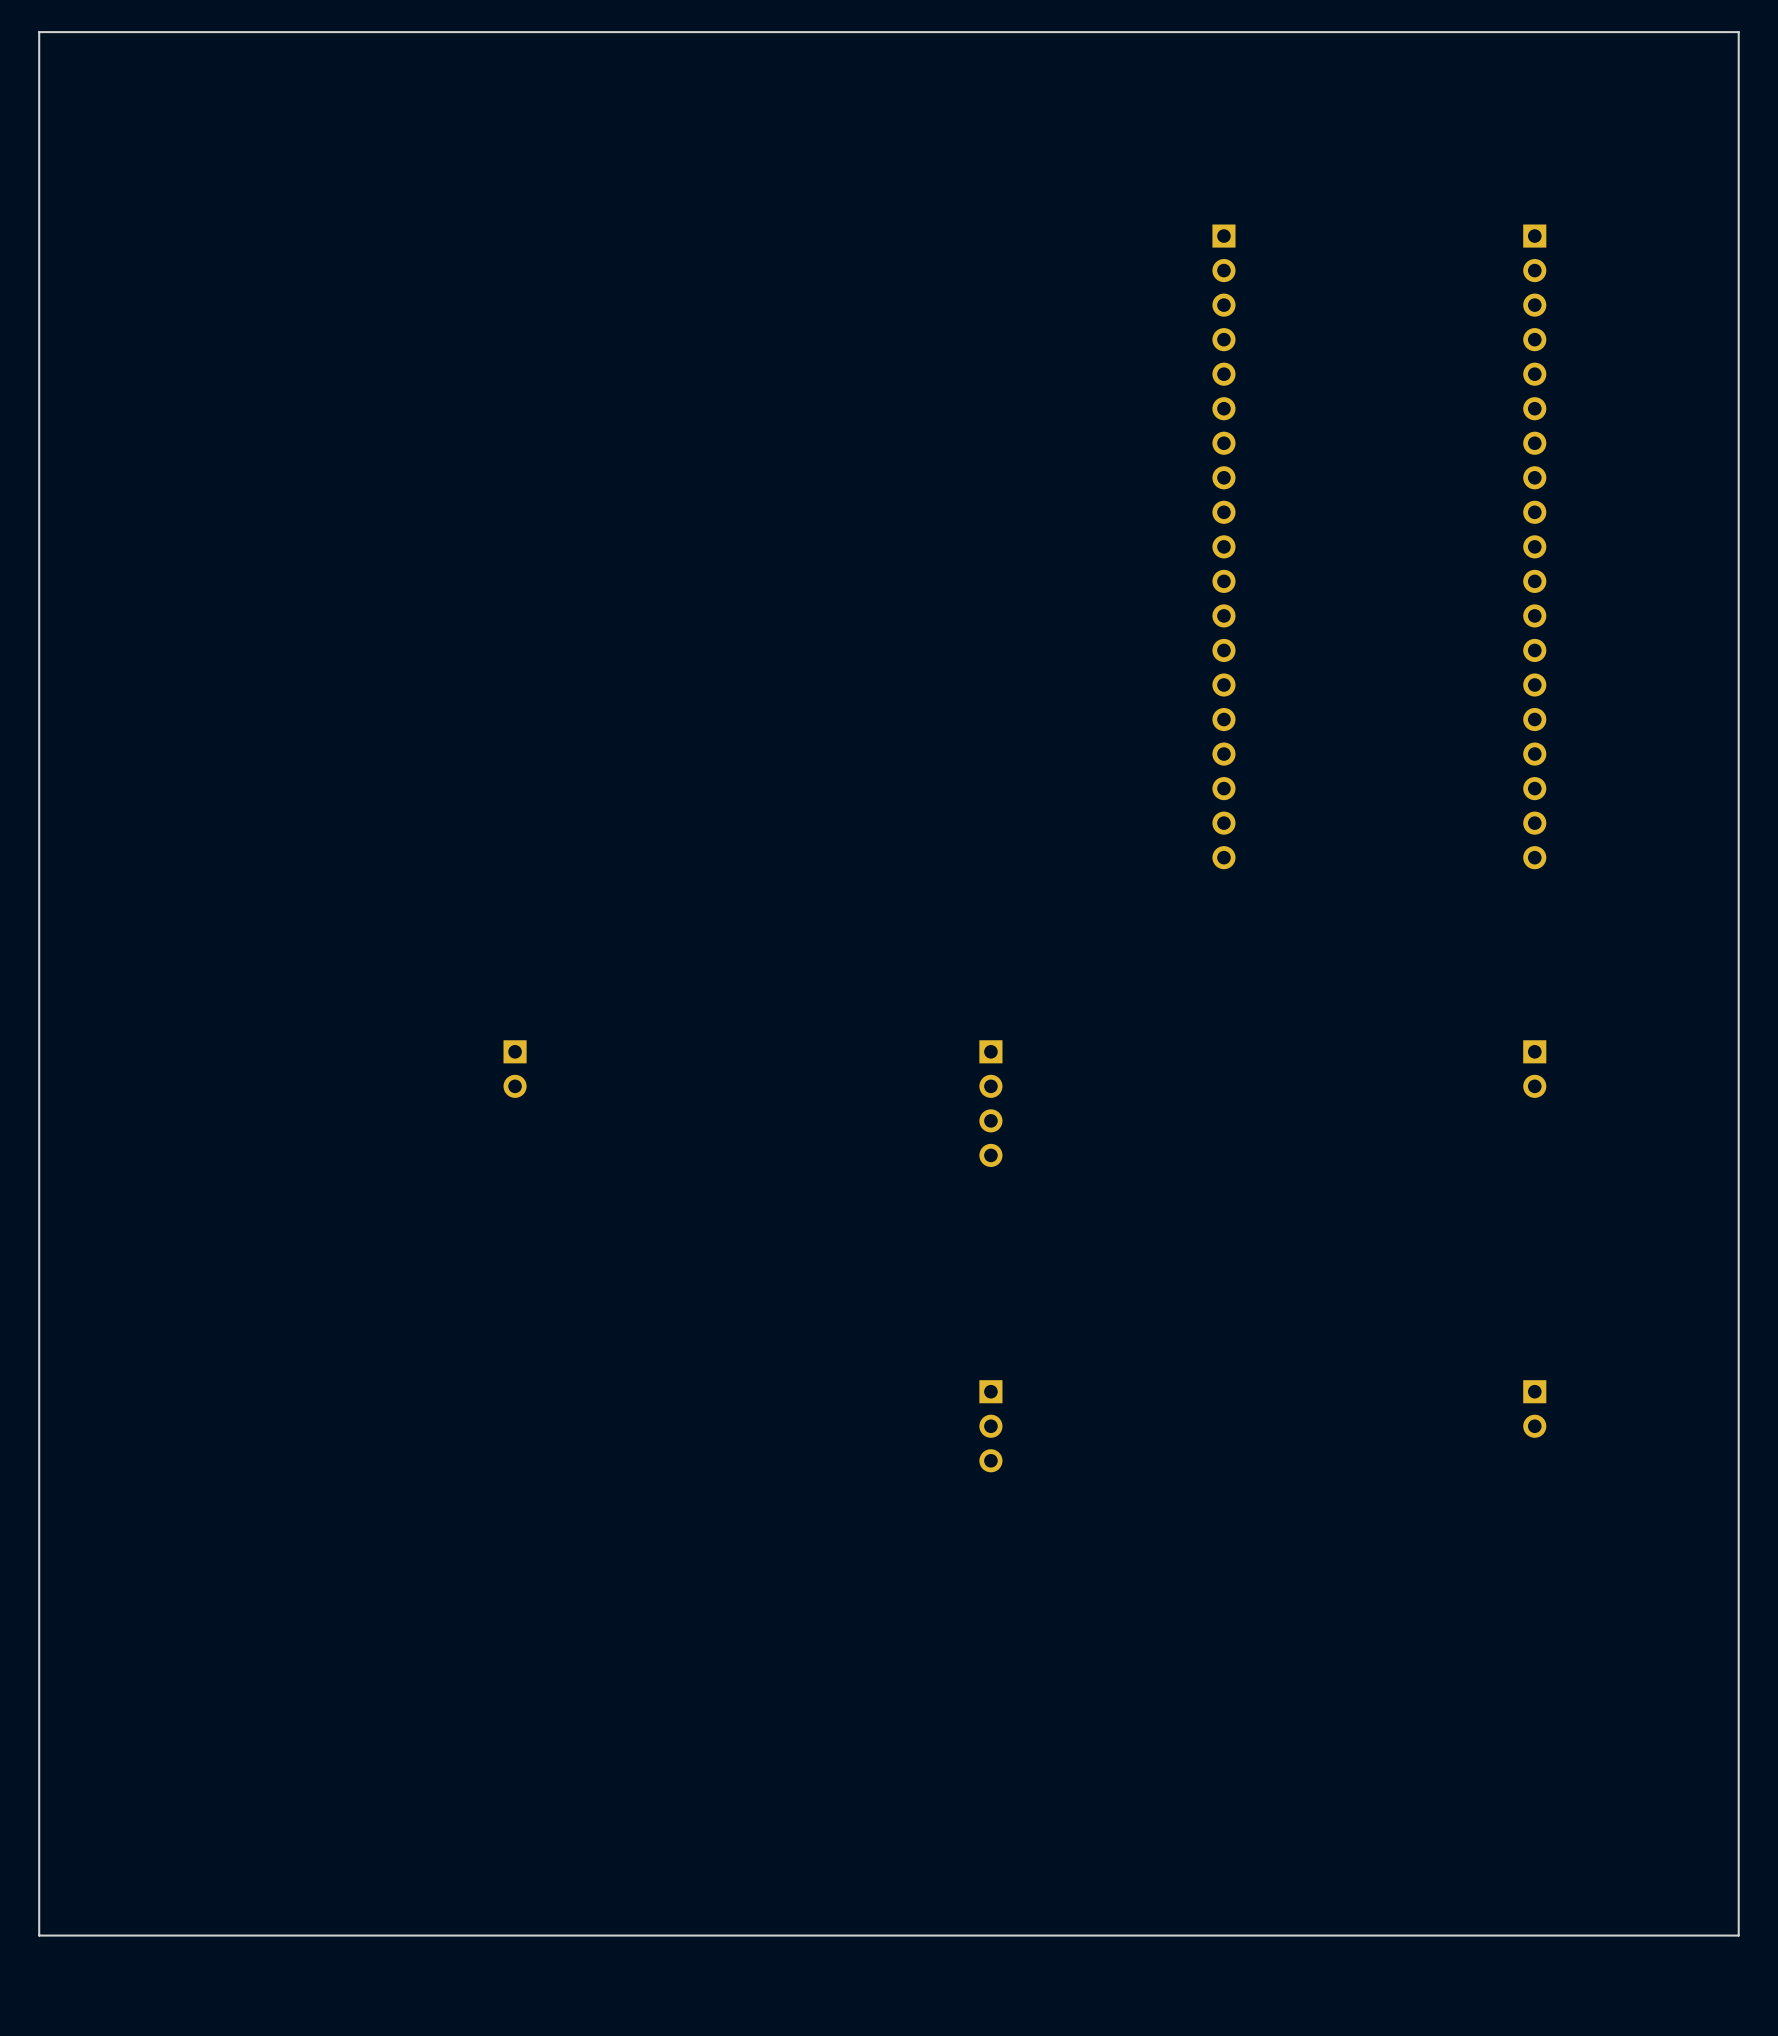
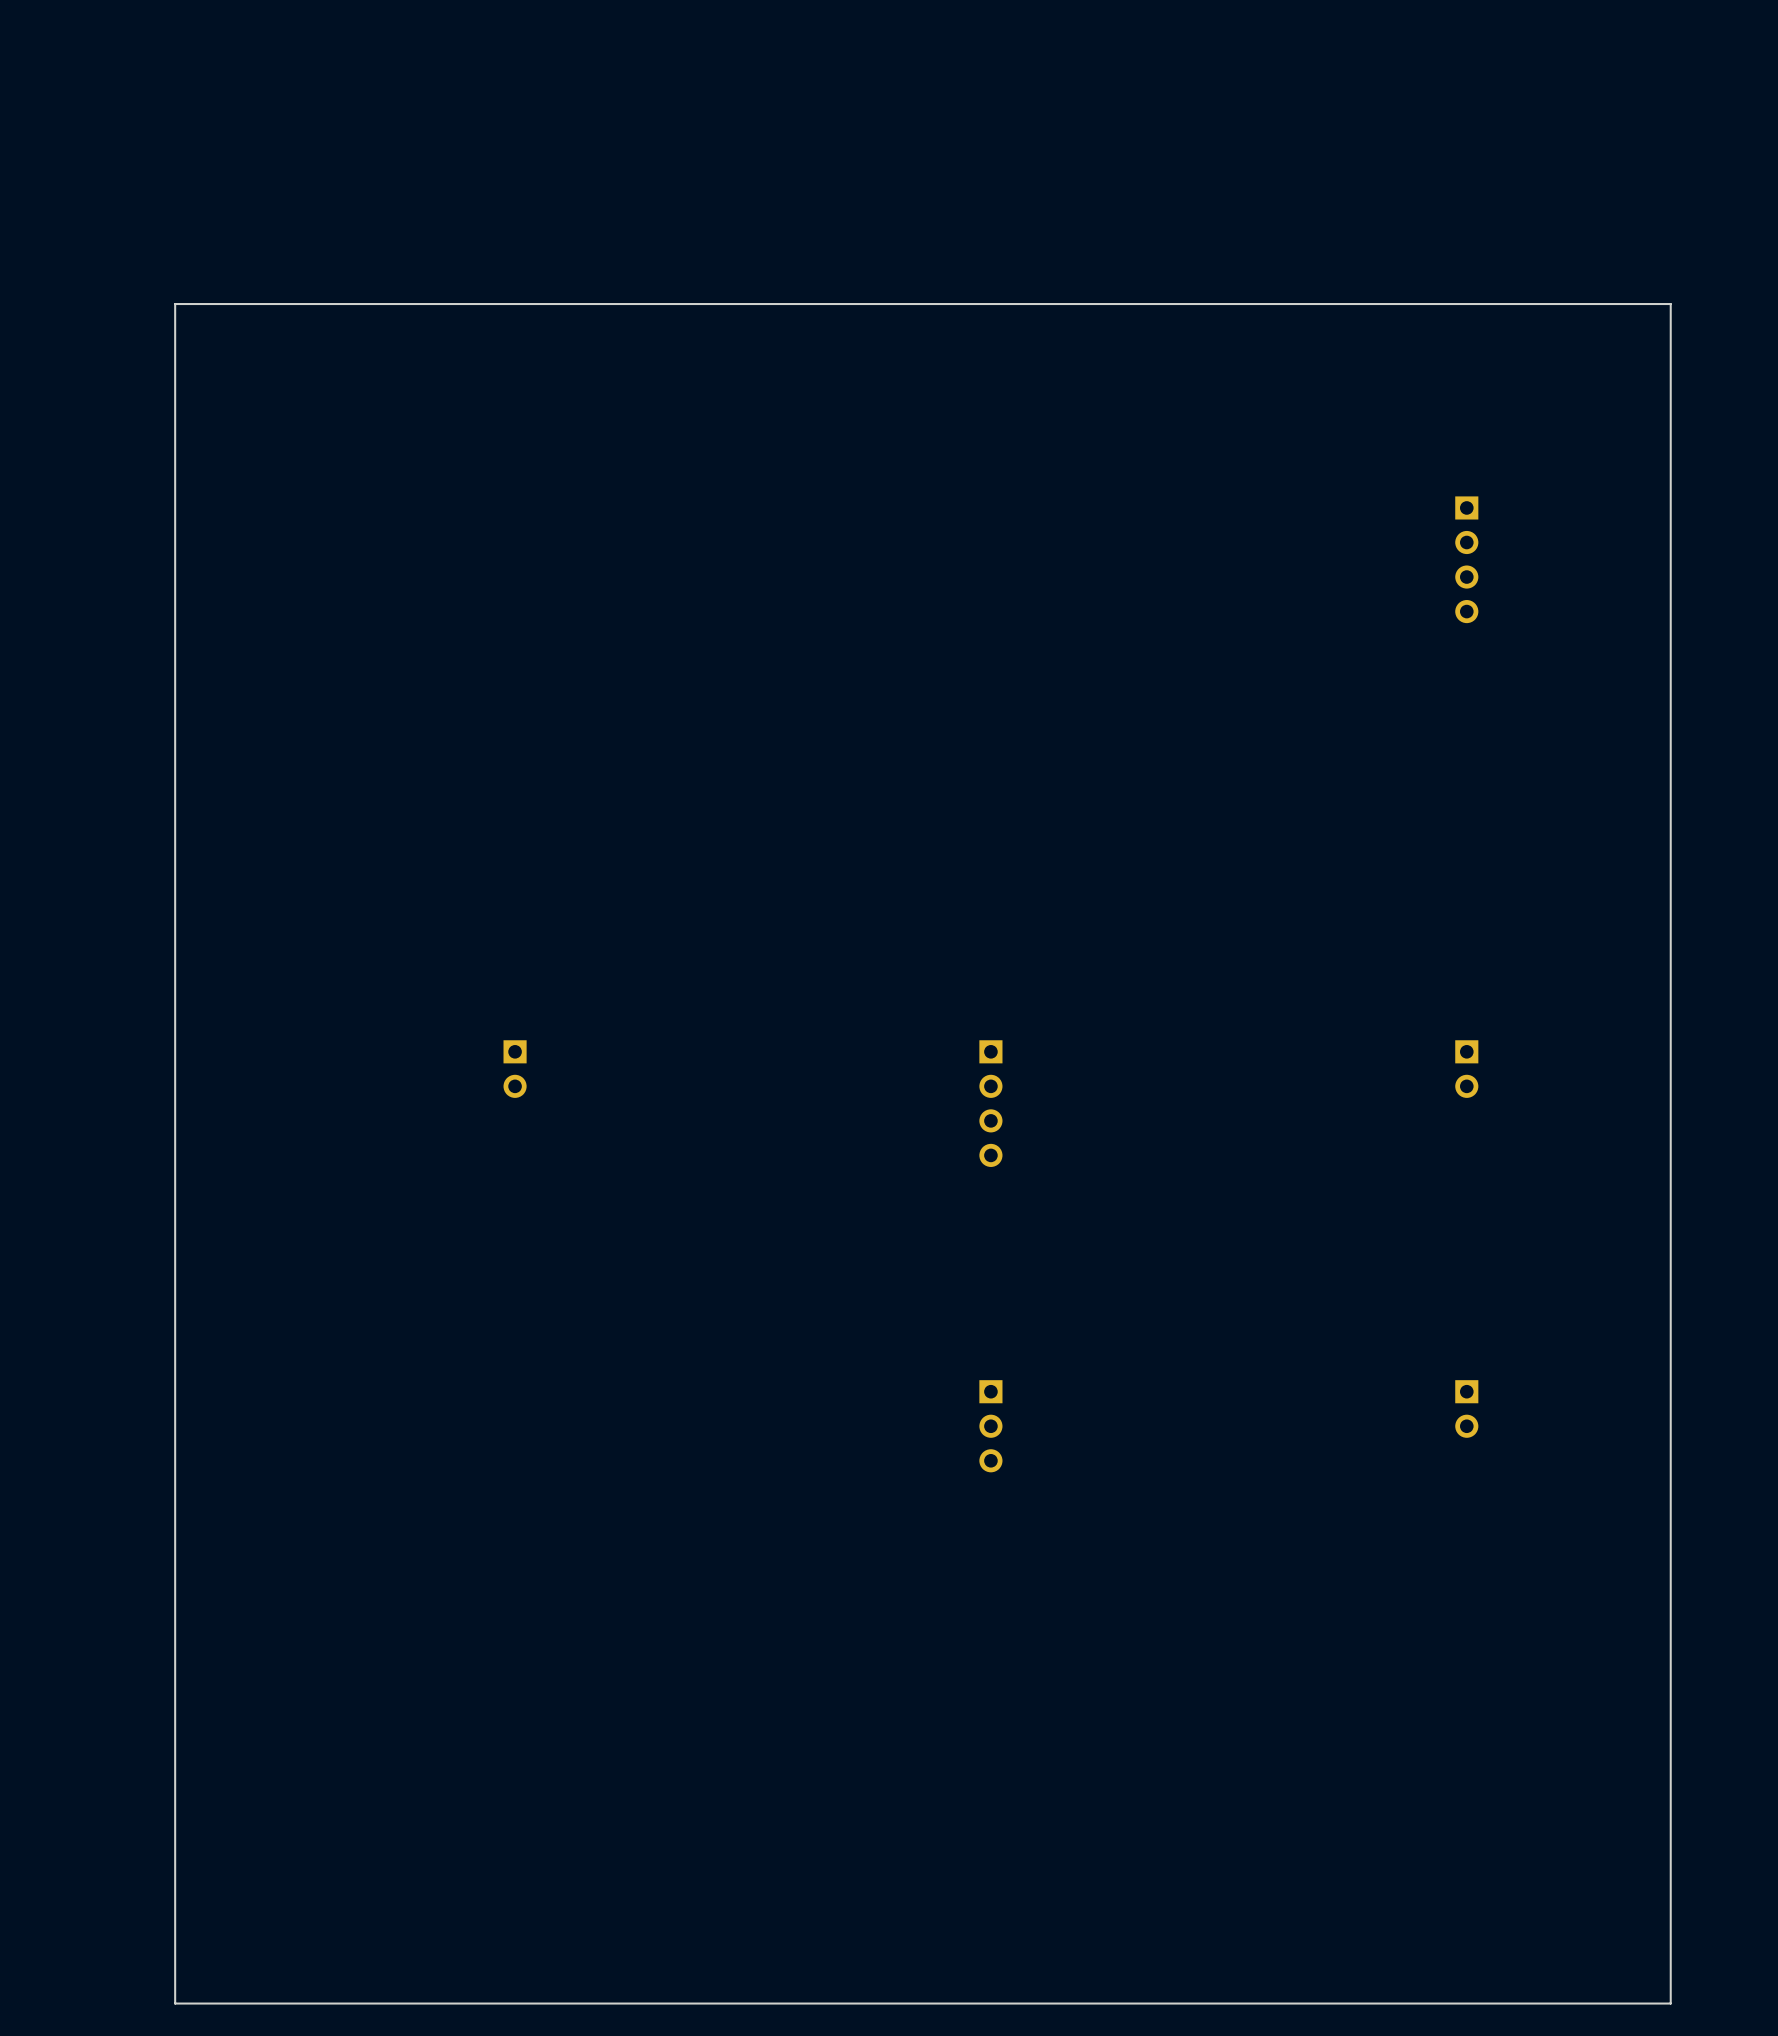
board edge: (1738, 32) (39, 32) (39, 1935) (1738, 1935) (1738, 32) -> (1670, 304) (1670, 2003) (175, 2003) (175, 304) (1670, 304)
part: (1223, 546) -> none
part: (1534, 546) -> none
part: none -> (1466, 559)
part position: (1534, 1069) -> (1466, 1069)
part position: (1534, 1408) -> (1466, 1408)

